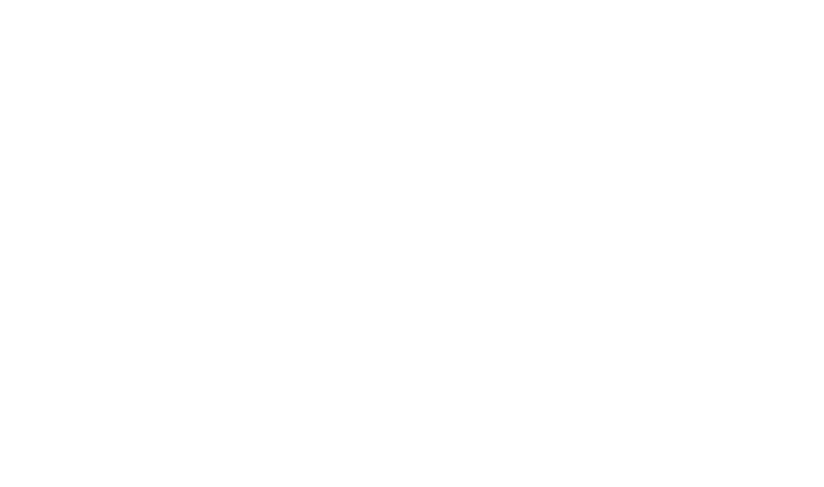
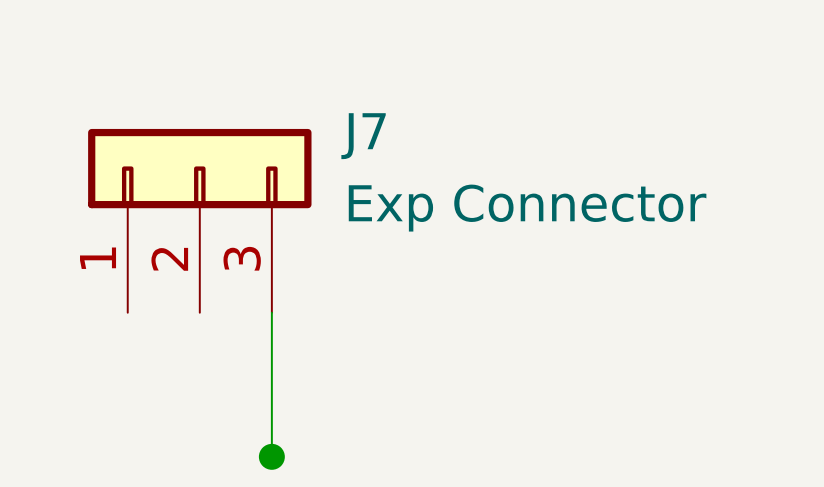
J7: none -> Exp Connector (199, 220)
wire: none -> (271, 312) (271, 456)
junction: none -> (271, 456)

